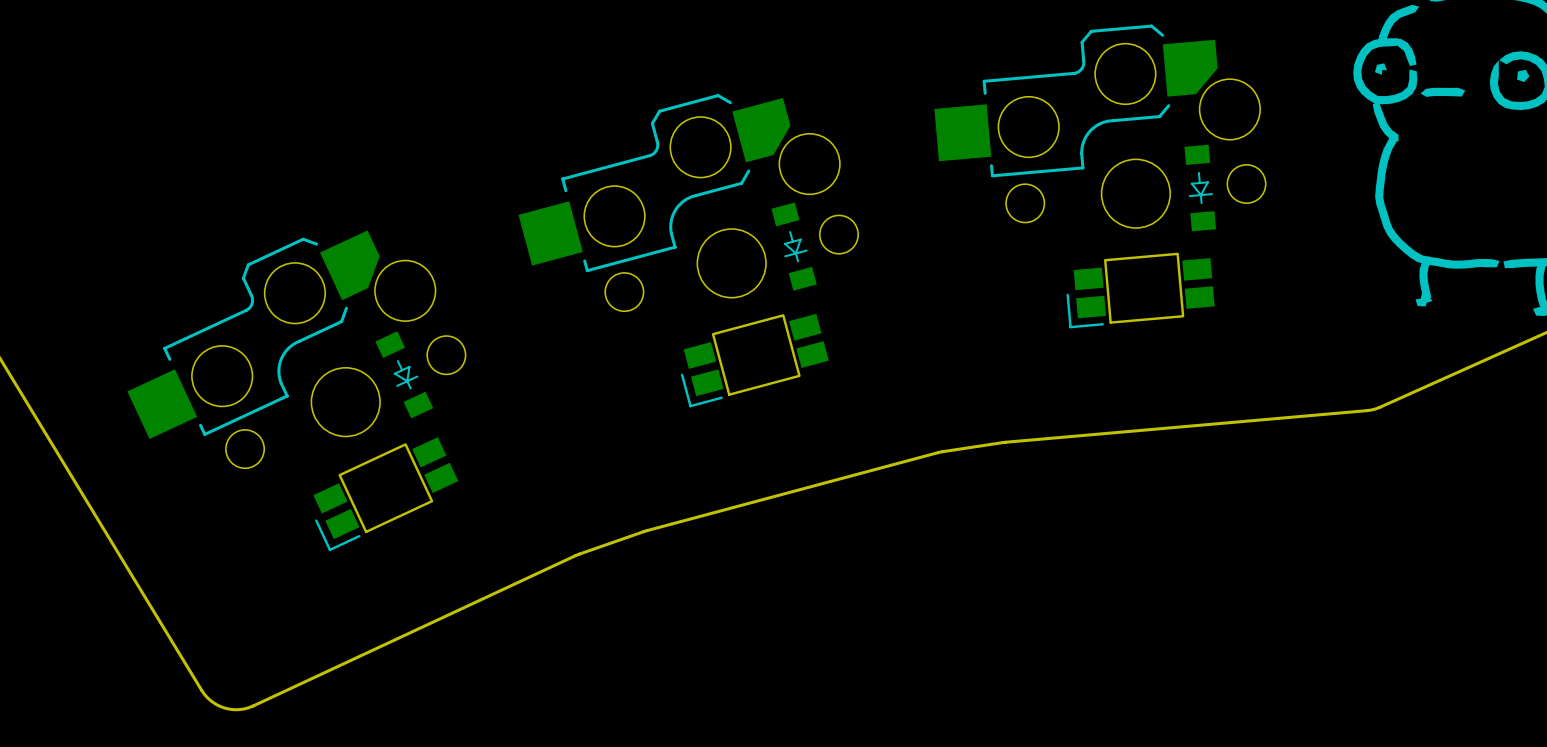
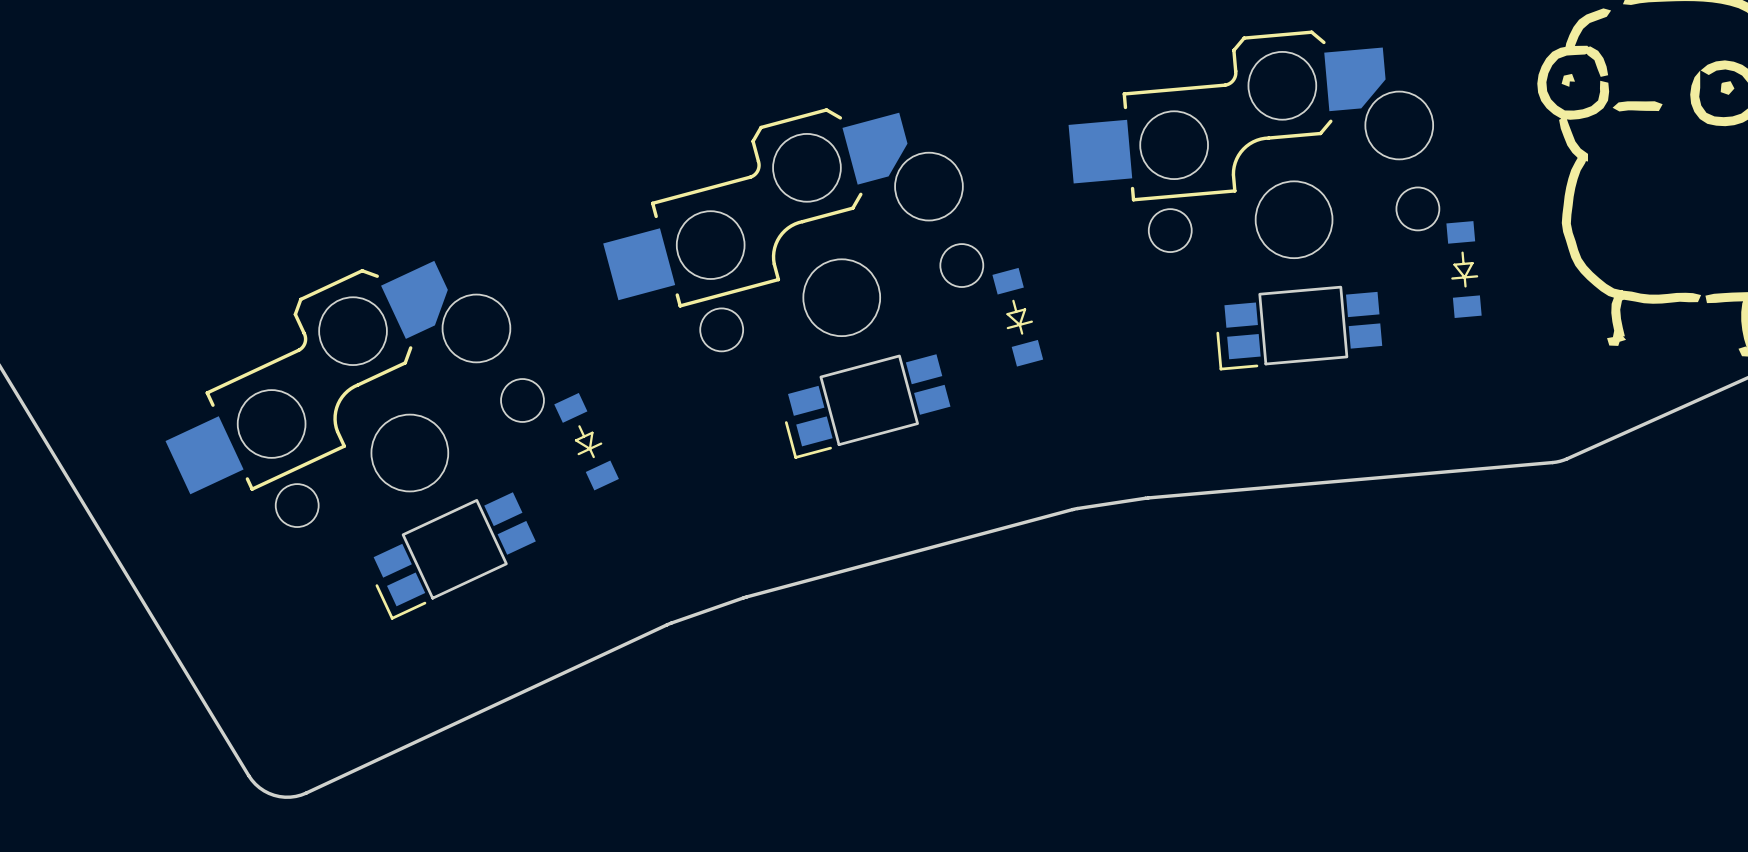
part position: (1200, 188) -> (1464, 269)
part position: (794, 246) -> (1017, 317)
part position: (404, 374) -> (586, 441)

